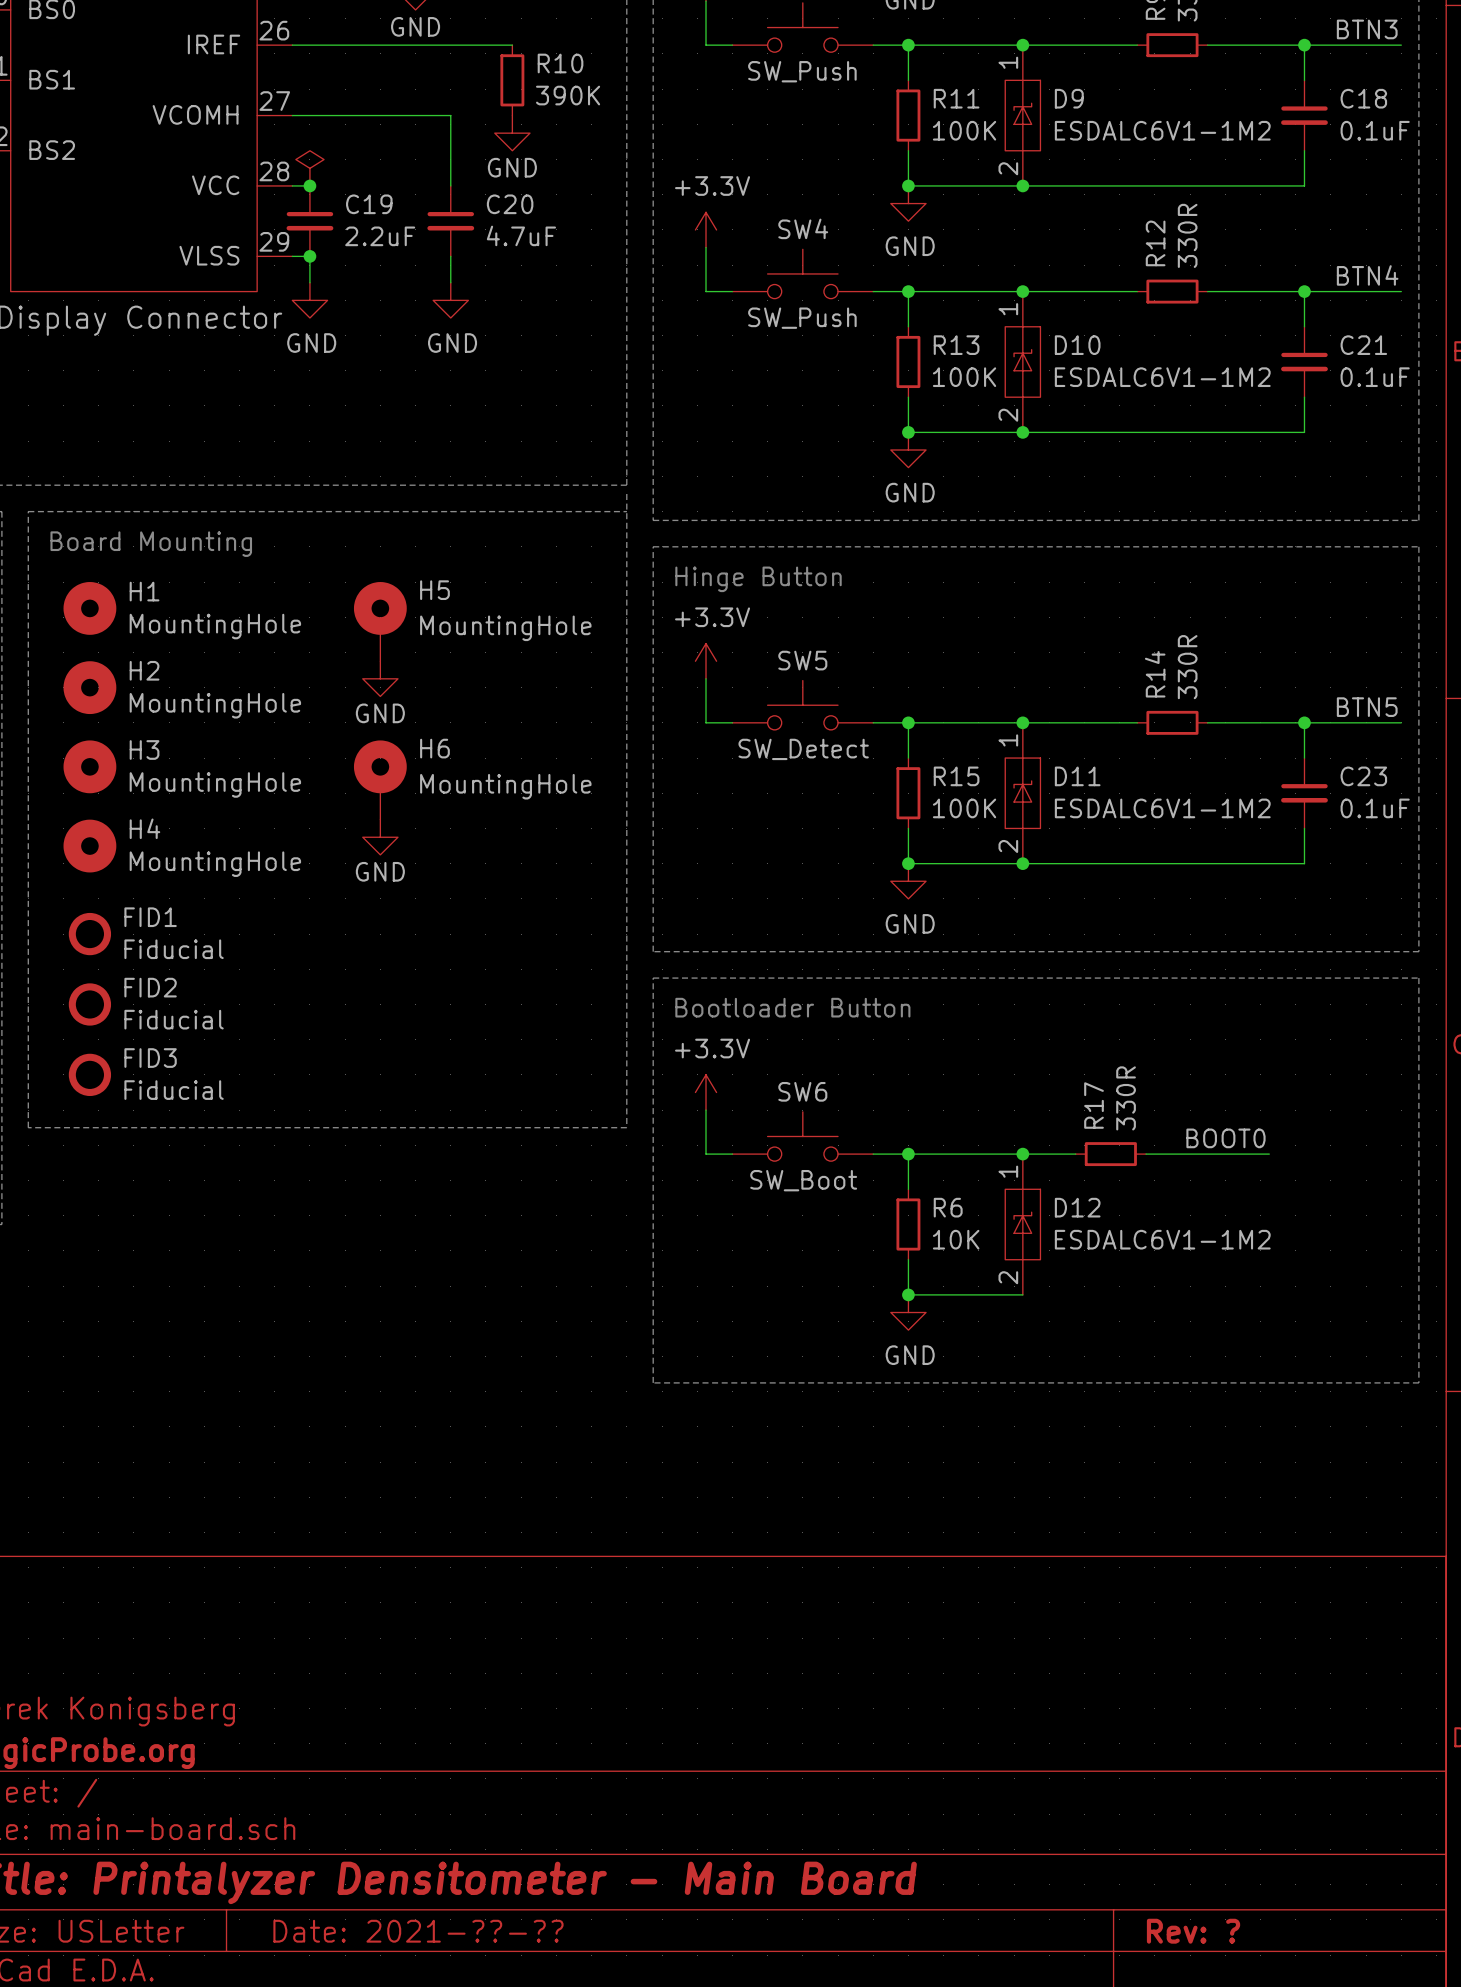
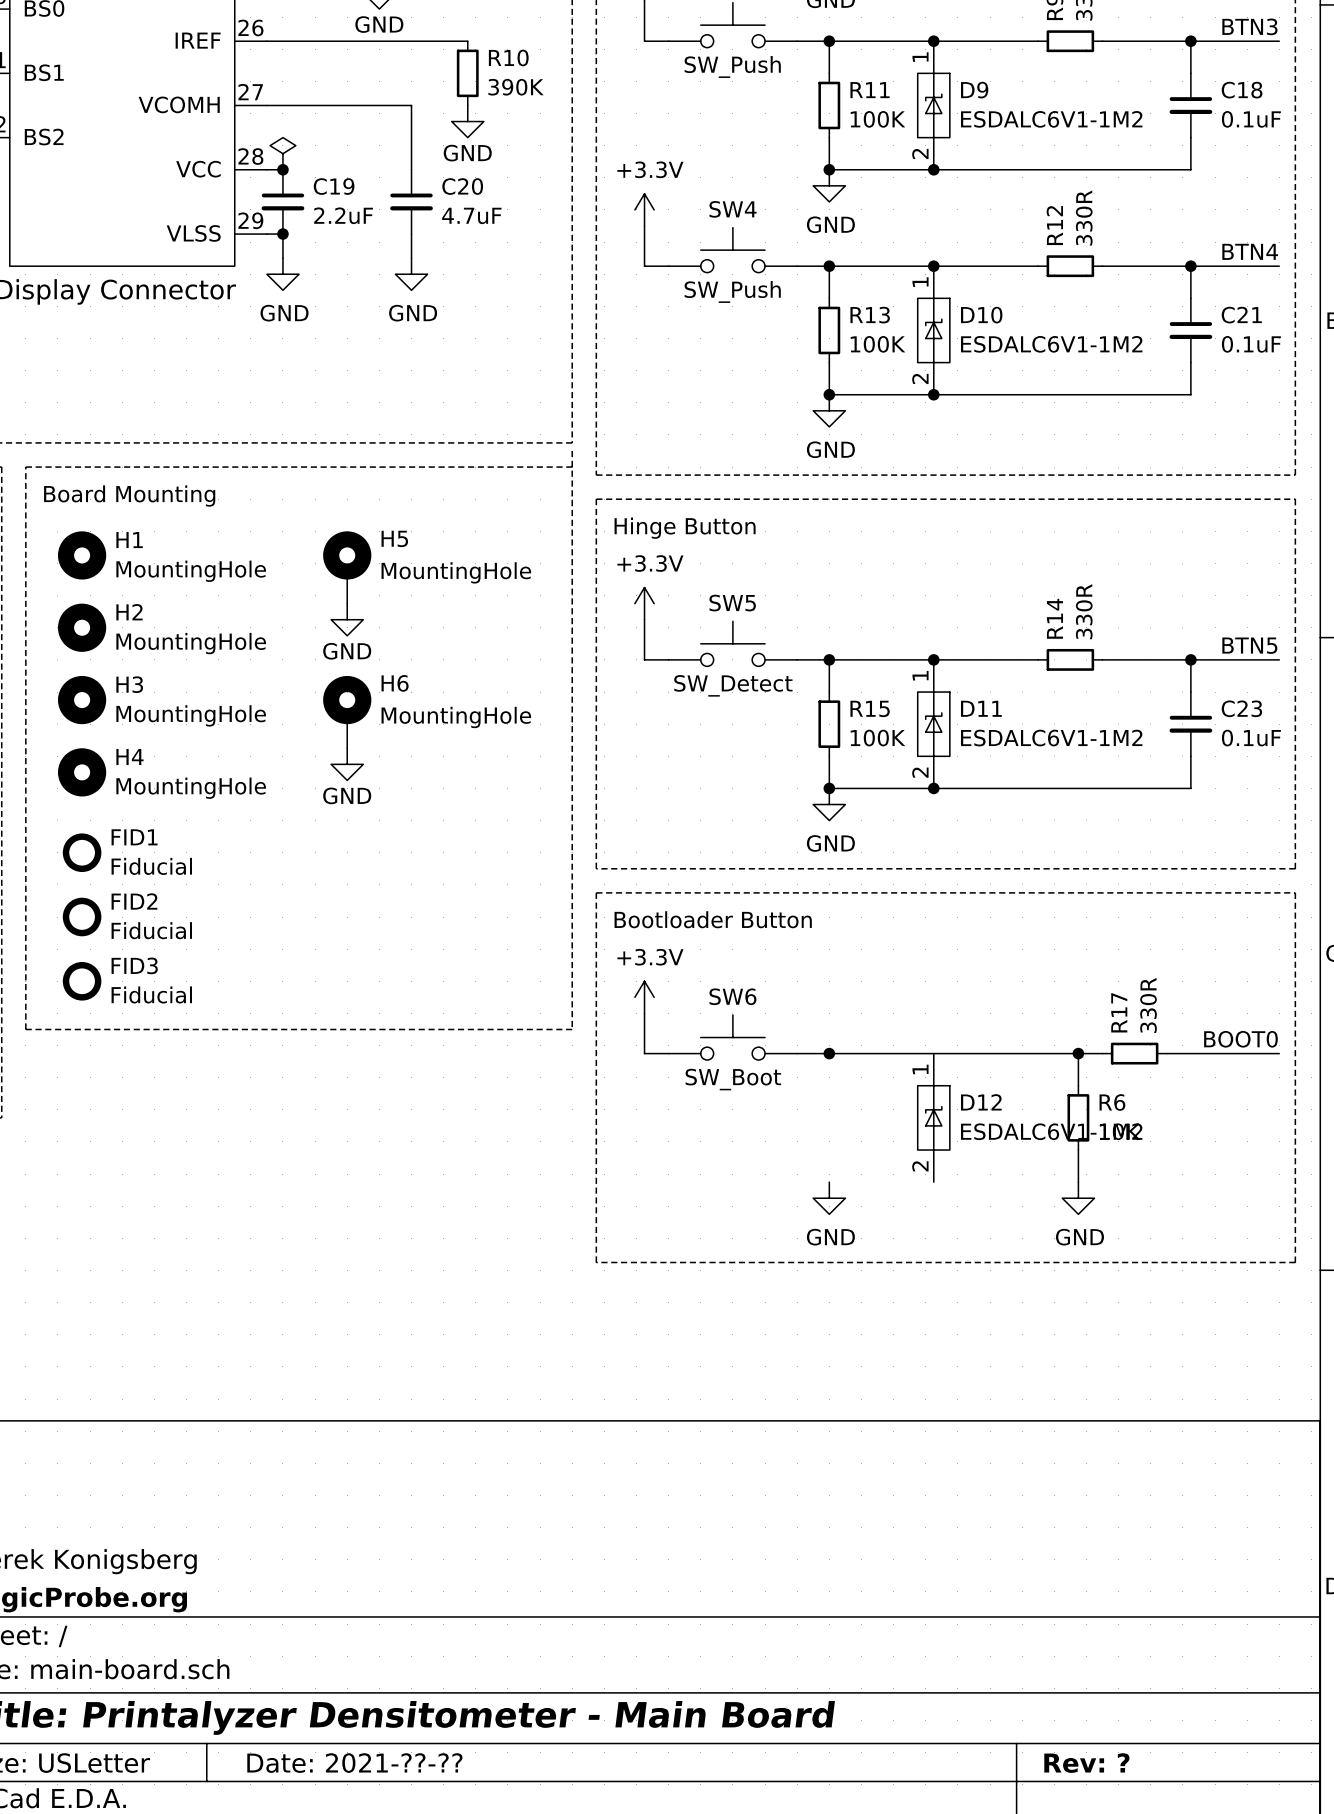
label position: BOOT0 (1225, 1138) -> BOOT0 (1240, 1039)
wire: (908, 1154) (908, 1189) -> (1078, 1053) (1078, 1085)
junction: (1022, 1154) -> none
wire: none -> (981, 1053) (1046, 1053)
R17 position: (1110, 1154) -> (1134, 1053)
junction: none -> (1078, 1053)
wire: (1207, 1154) (1269, 1154) -> none
wire: none -> (1166, 1053) (1279, 1053)
R6 position: (908, 1224) -> (1078, 1117)
wire: (908, 1259) (908, 1294) (1022, 1294) -> none
wire: none -> (1078, 1150) (1078, 1182)
junction: (908, 1294) -> none
power symbol: none -> GND (1078, 1198)

